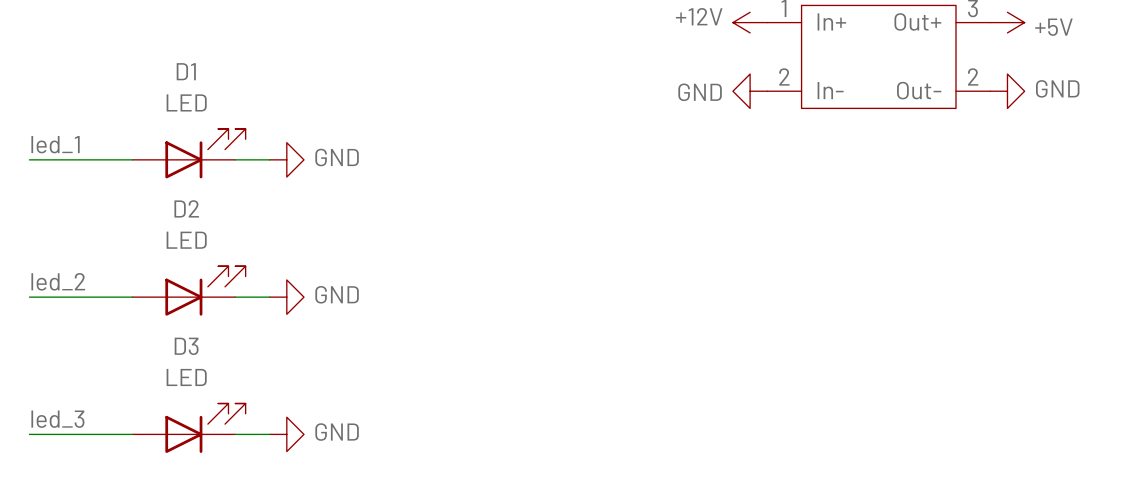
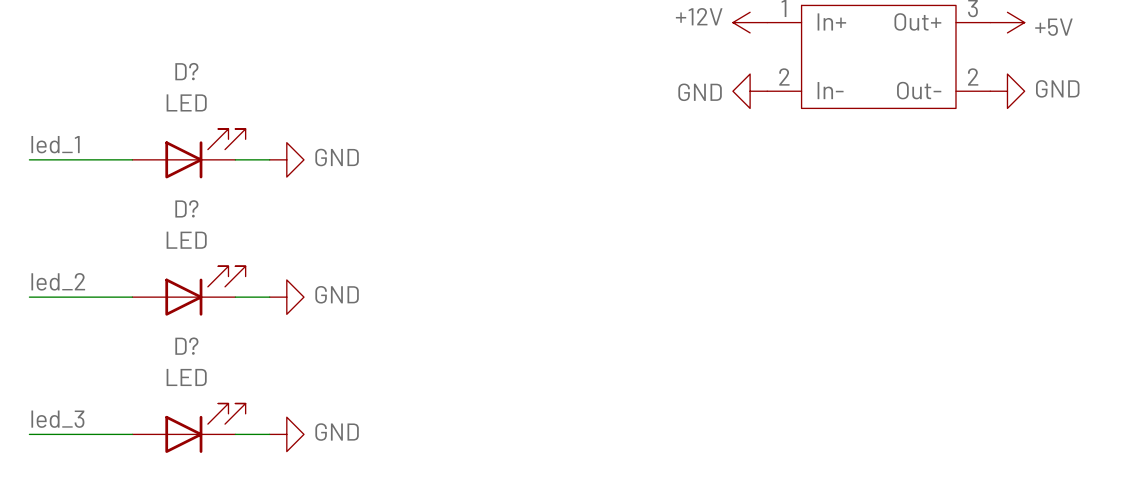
D1 name: D1 (186, 71) -> D? (186, 71)
D2 name: D2 (186, 208) -> D? (186, 208)
D3 name: D3 (186, 346) -> D? (186, 346)

